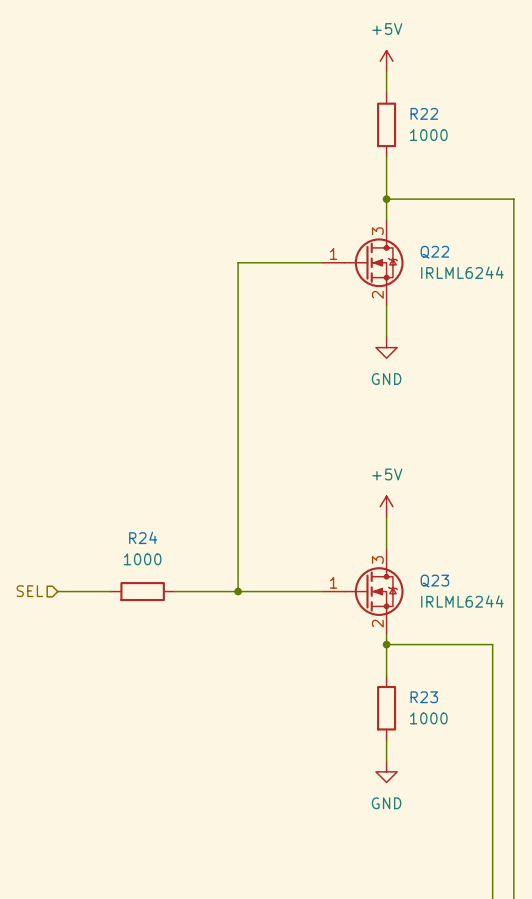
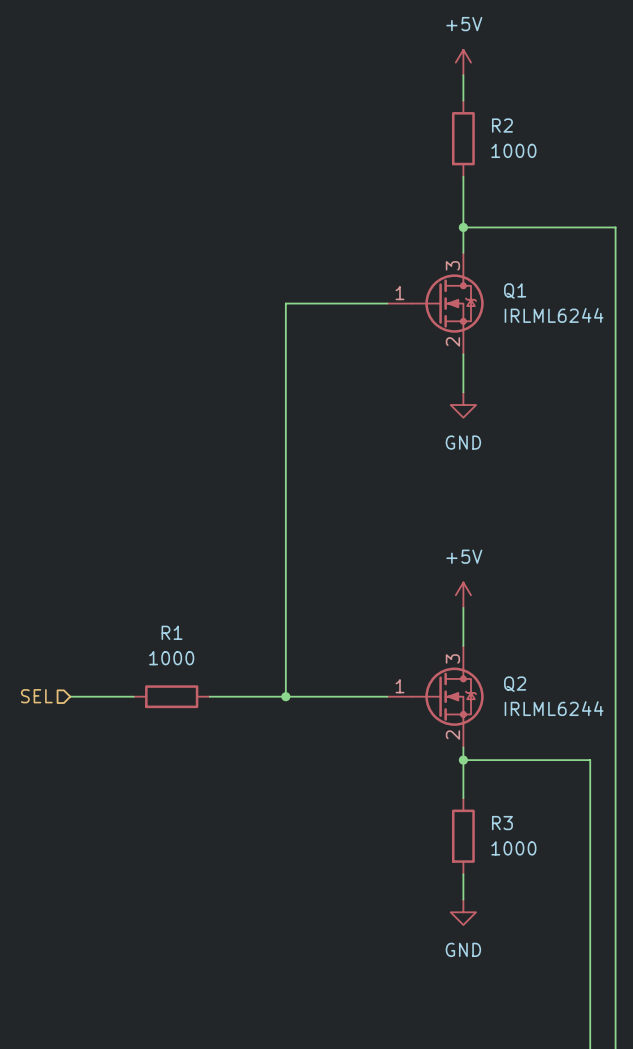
R22 name: R22 (424, 113) -> R2 (502, 125)
Q22 name: Q22 (434, 252) -> Q1 (515, 291)
R24 name: R24 (143, 537) -> R1 (172, 632)
Q23 name: Q23 (434, 581) -> Q2 (515, 684)
R23 name: R23 (424, 697) -> R3 (502, 823)

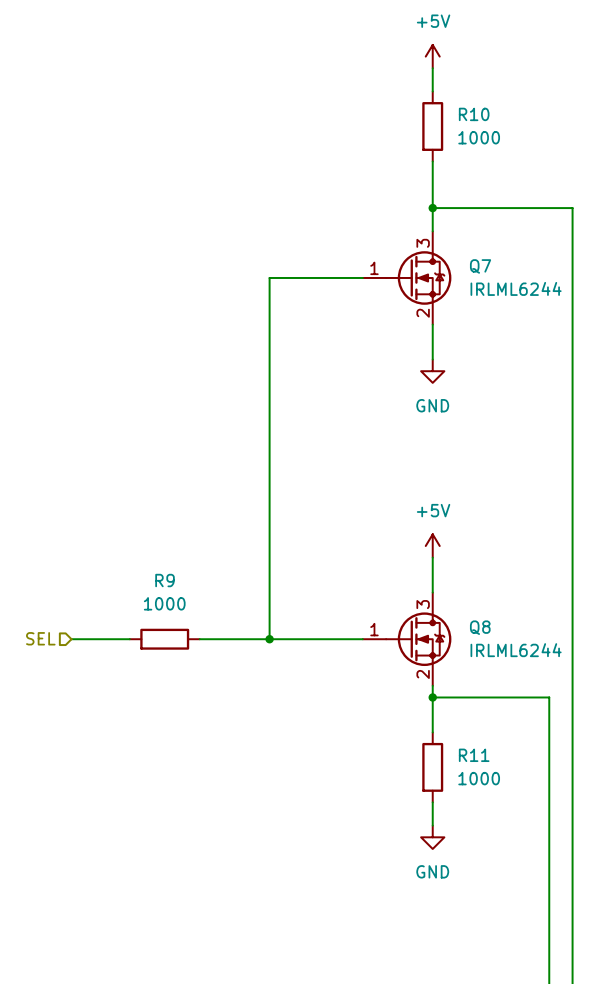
R2 name: R2 (502, 125) -> R10 (474, 114)
Q1 name: Q1 (515, 291) -> Q7 (480, 266)
R1 name: R1 (172, 632) -> R9 (165, 580)
Q2 name: Q2 (515, 684) -> Q8 (480, 627)
R3 name: R3 (502, 823) -> R11 (474, 755)

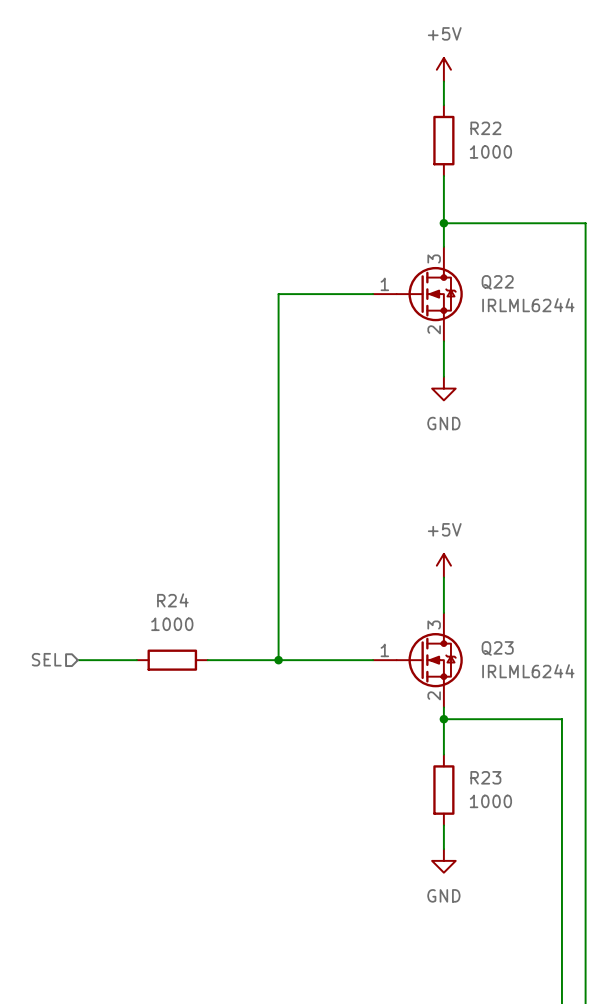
R10 name: R10 (474, 114) -> R22 (485, 128)
Q7 name: Q7 (480, 266) -> Q22 (497, 282)
R9 name: R9 (165, 580) -> R24 (172, 600)
Q8 name: Q8 (480, 627) -> Q23 (497, 648)
R11 name: R11 (474, 755) -> R23 (485, 777)

